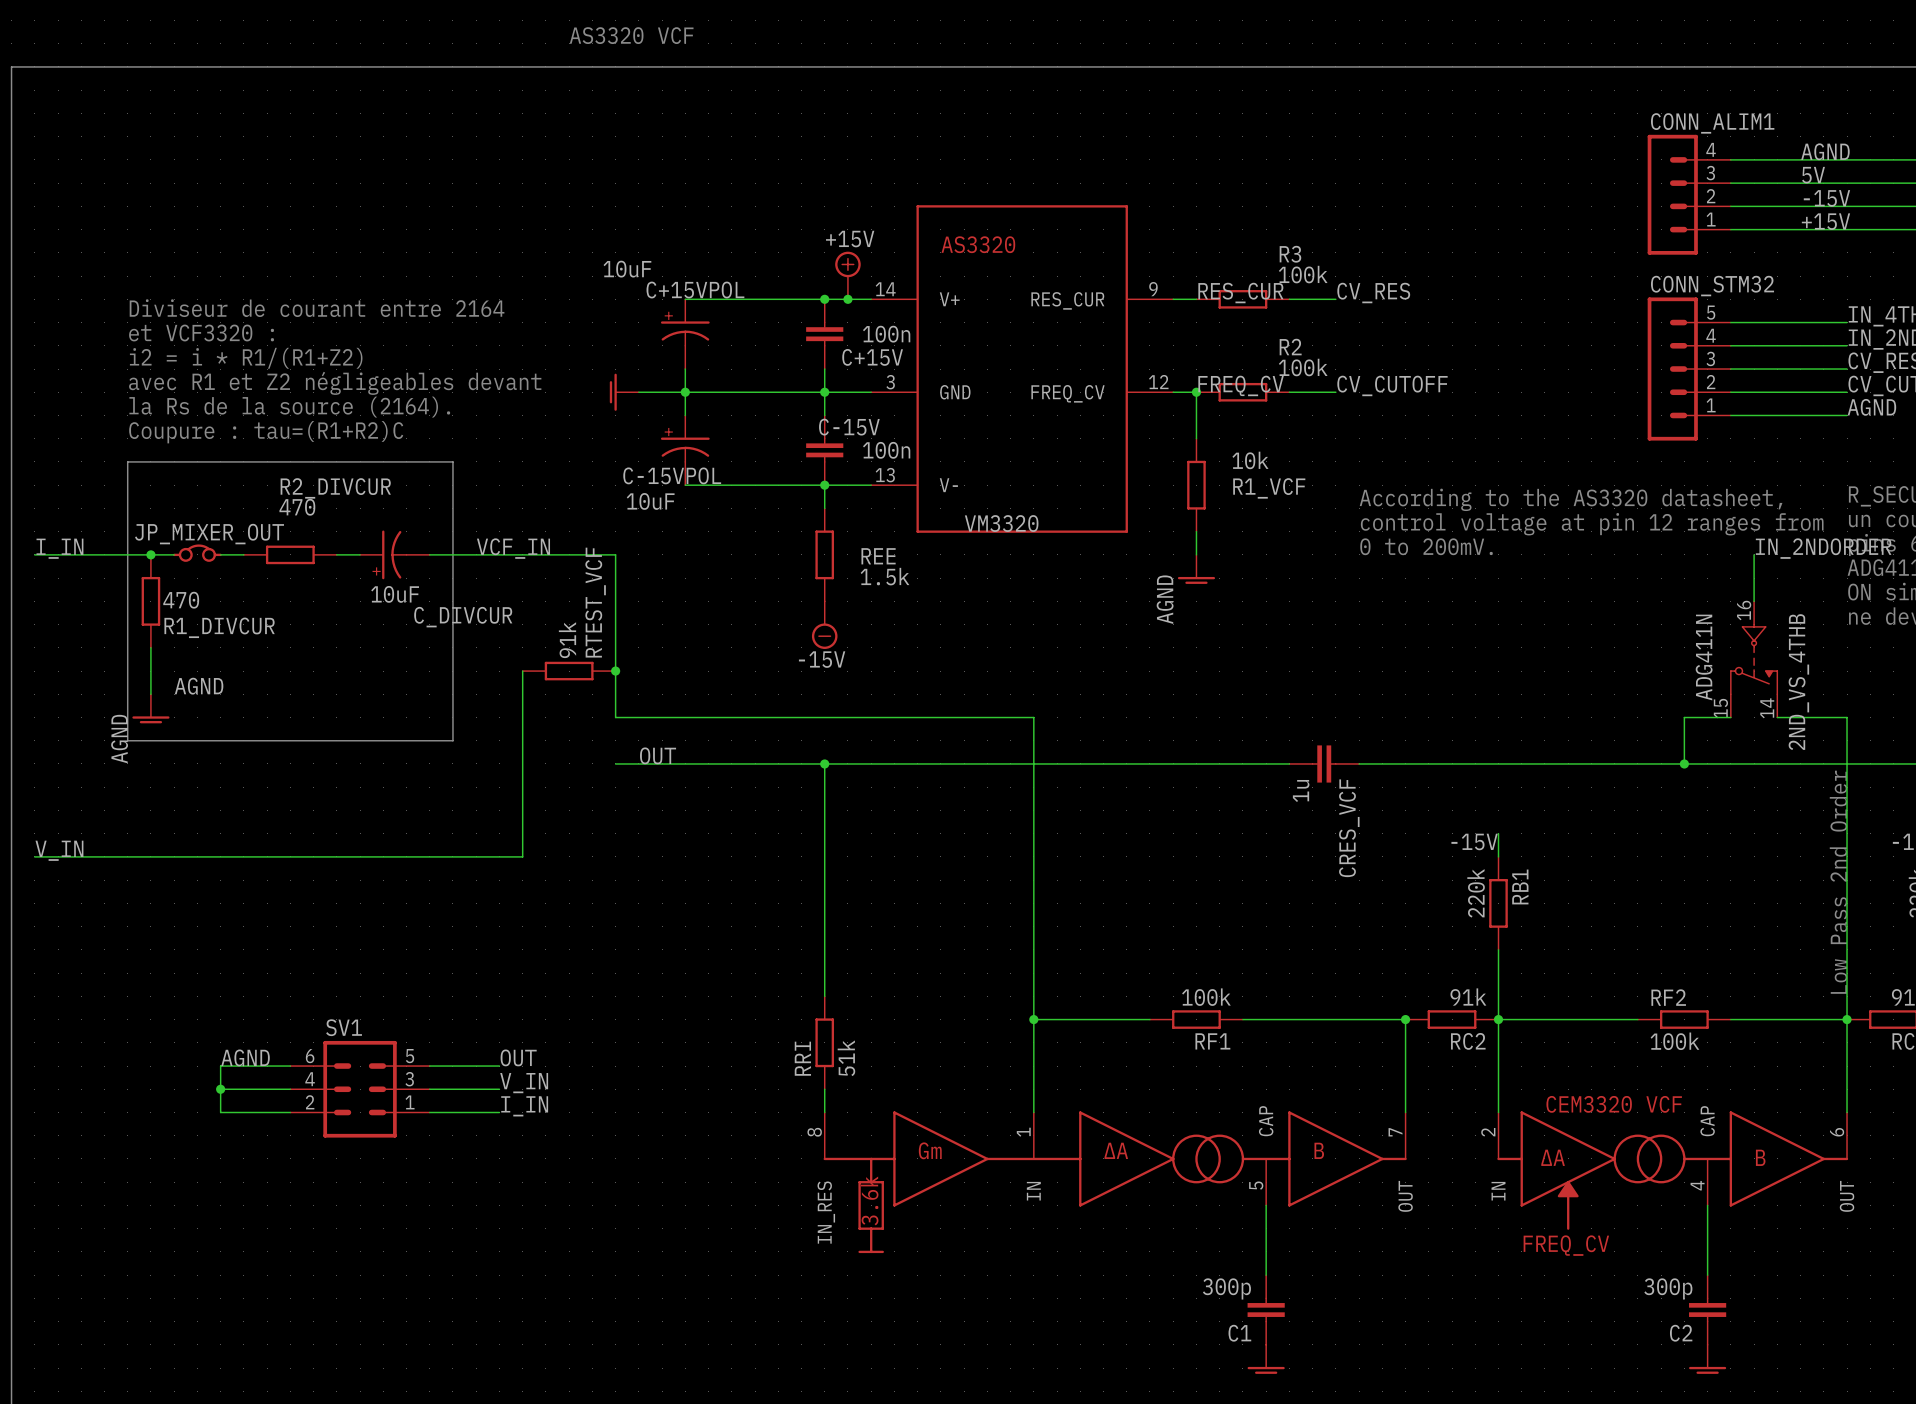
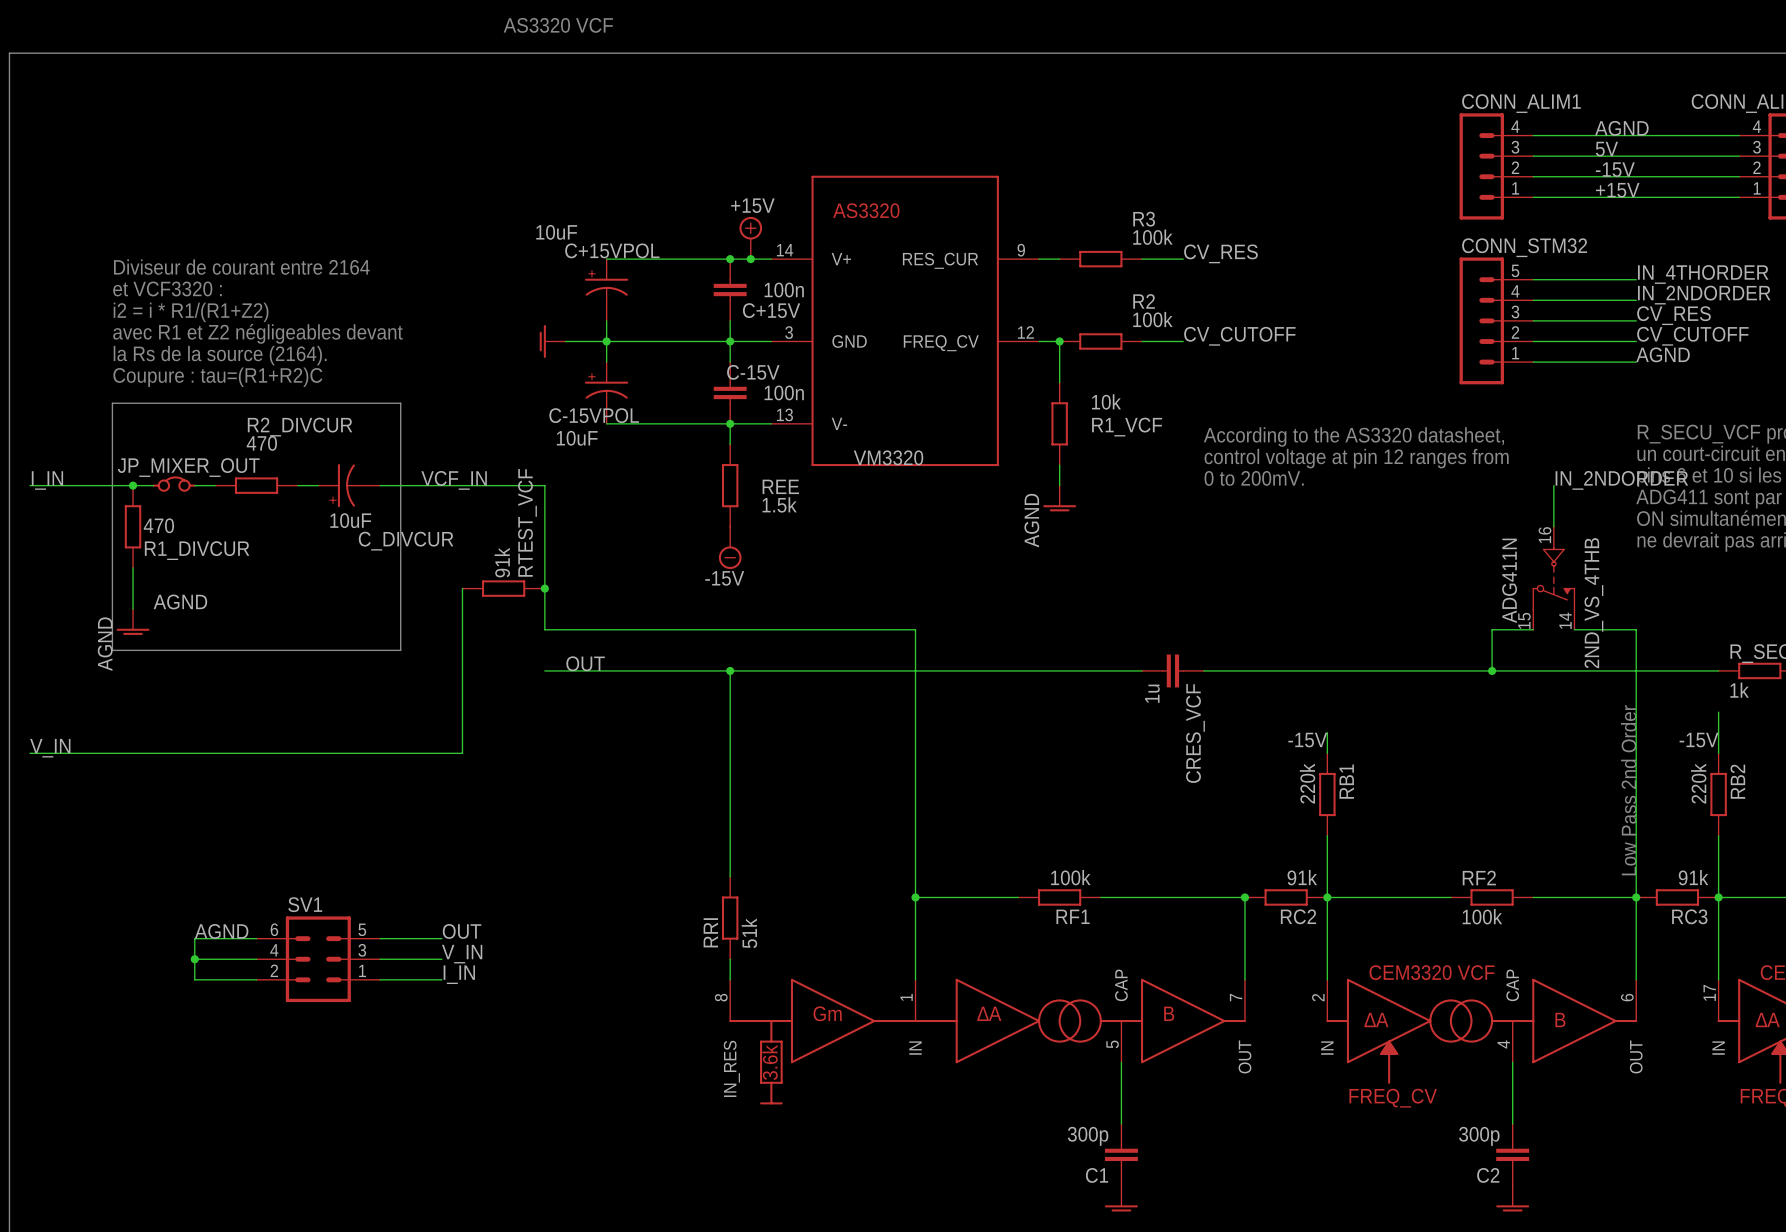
label: RES_CUR (1240, 293) -> none
label: FREQ_CV (1241, 385) -> none

